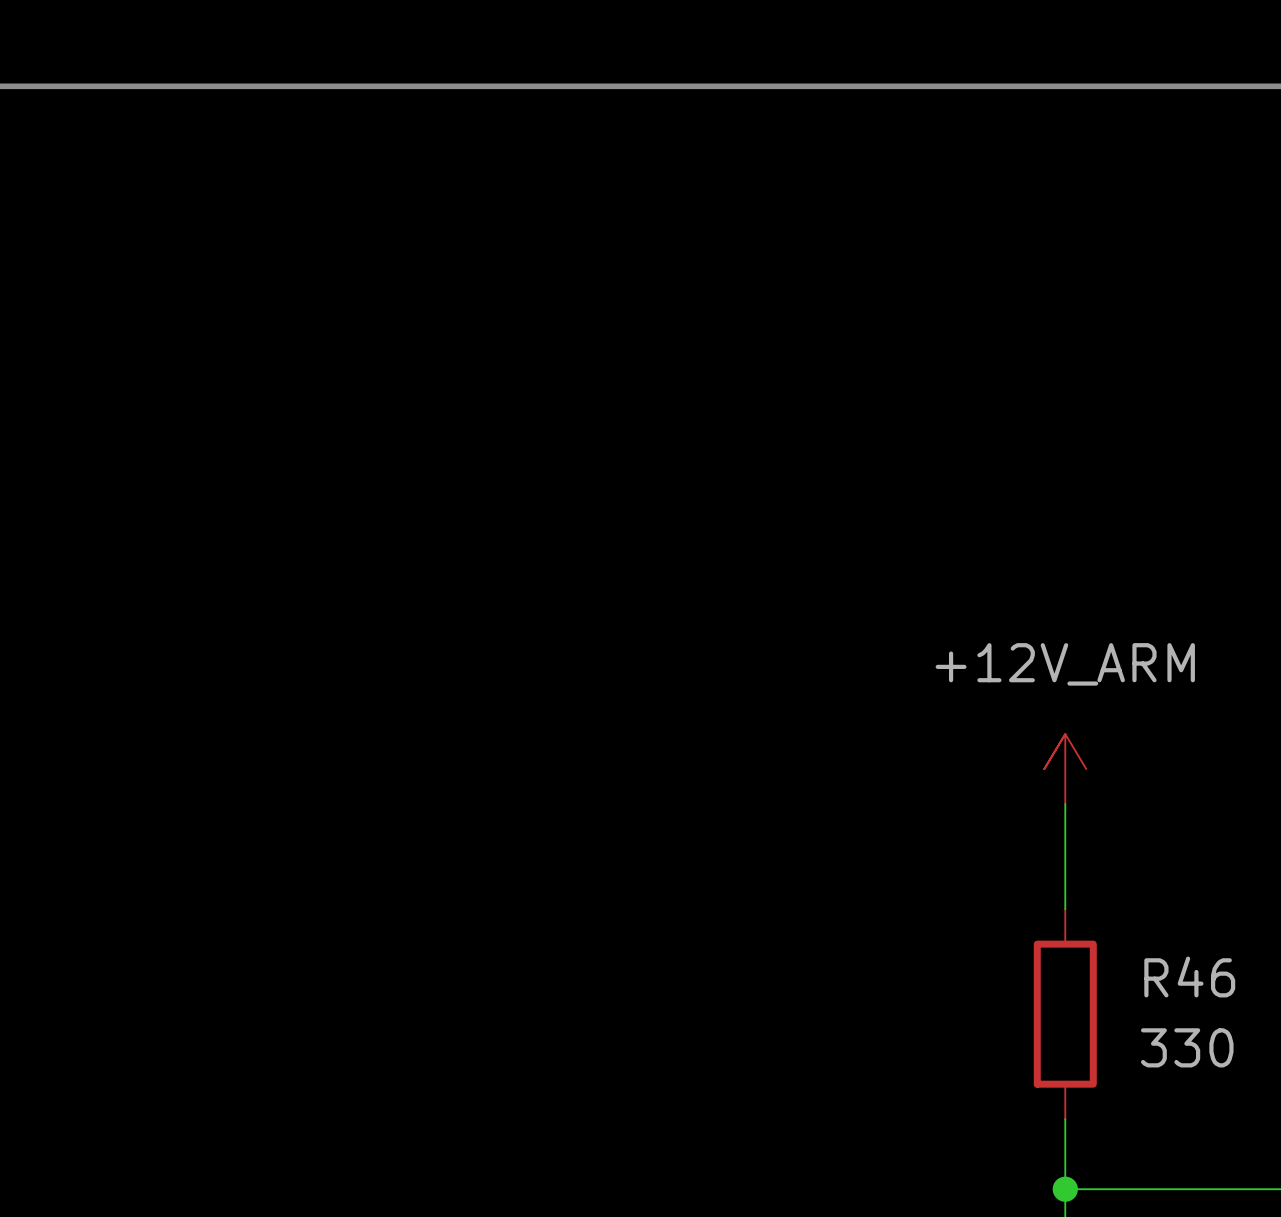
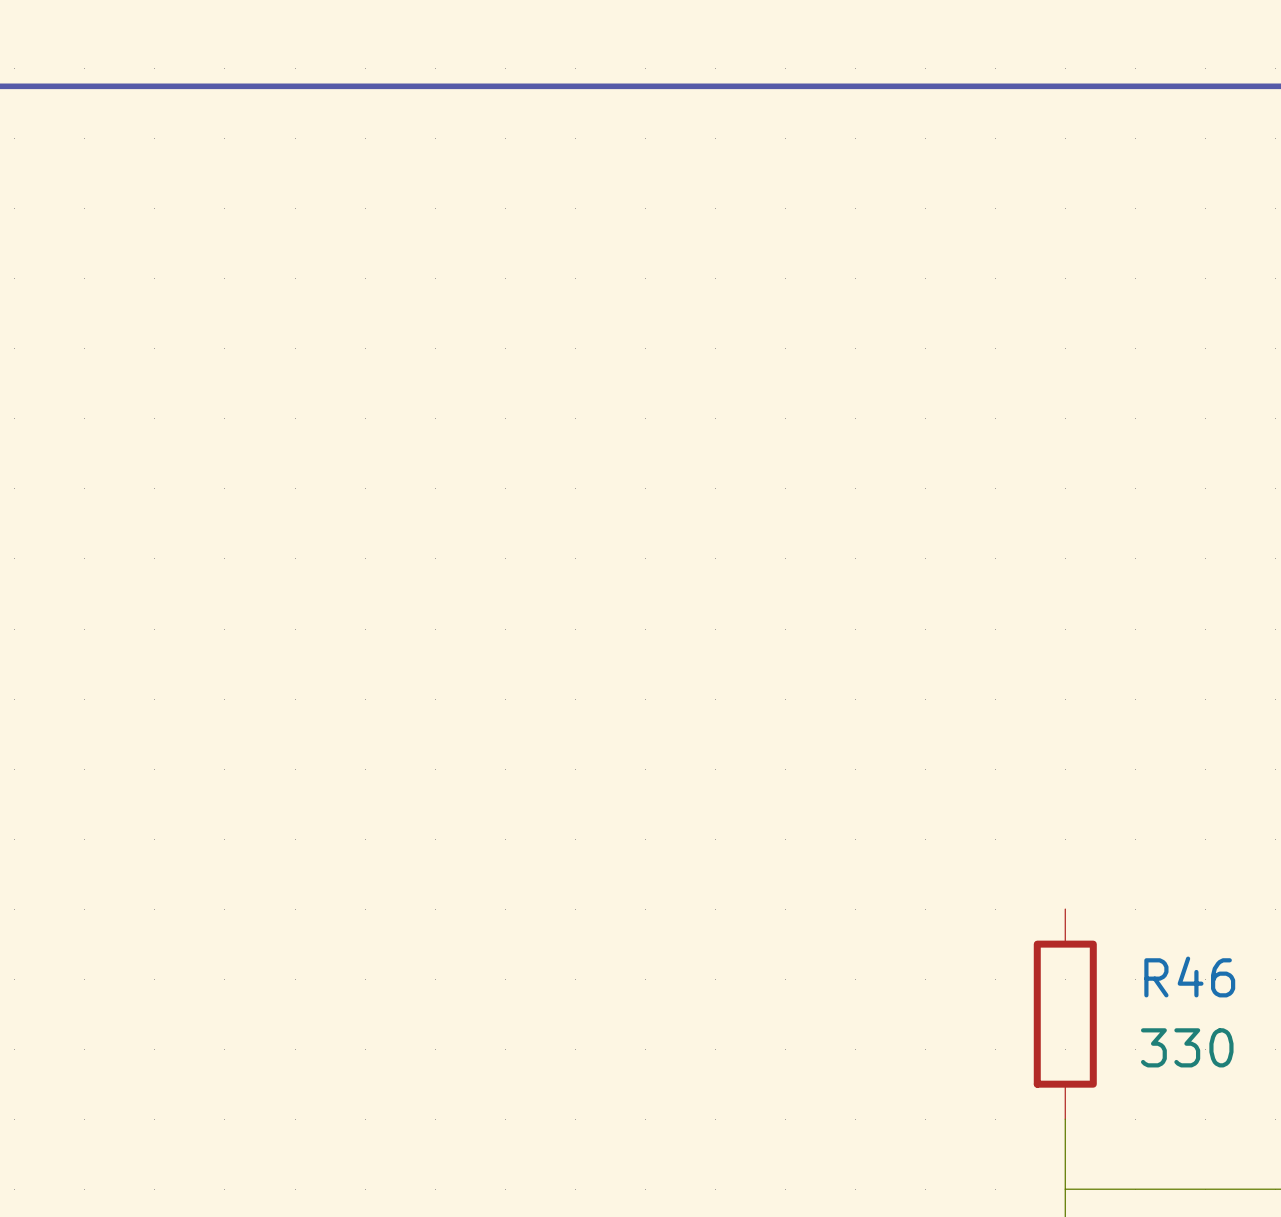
power symbol: +12V_ARM (1065, 769) -> none
wire: (1065, 804) (1065, 909) -> none
junction: (1065, 1189) -> none

